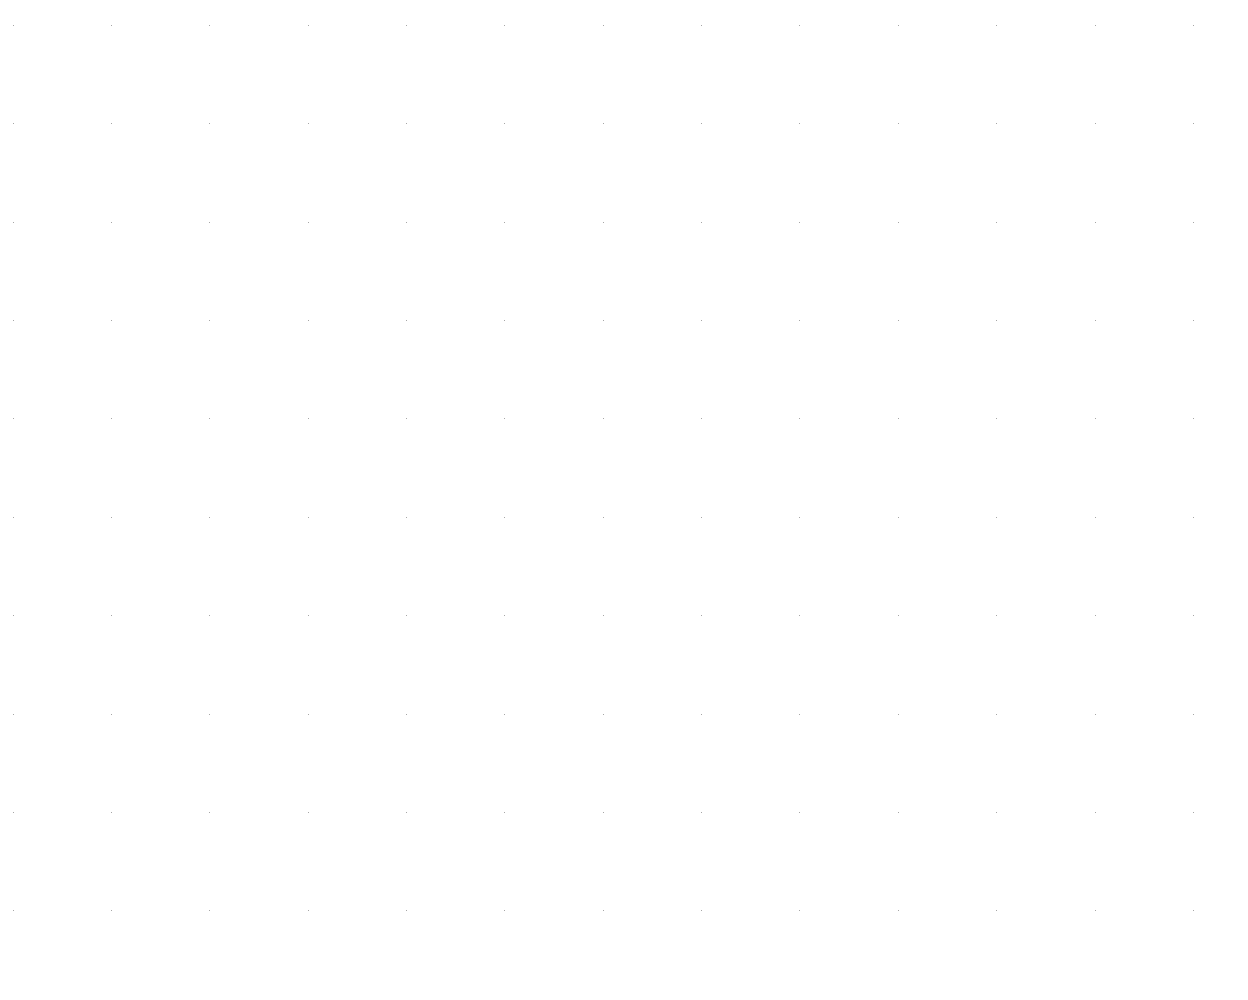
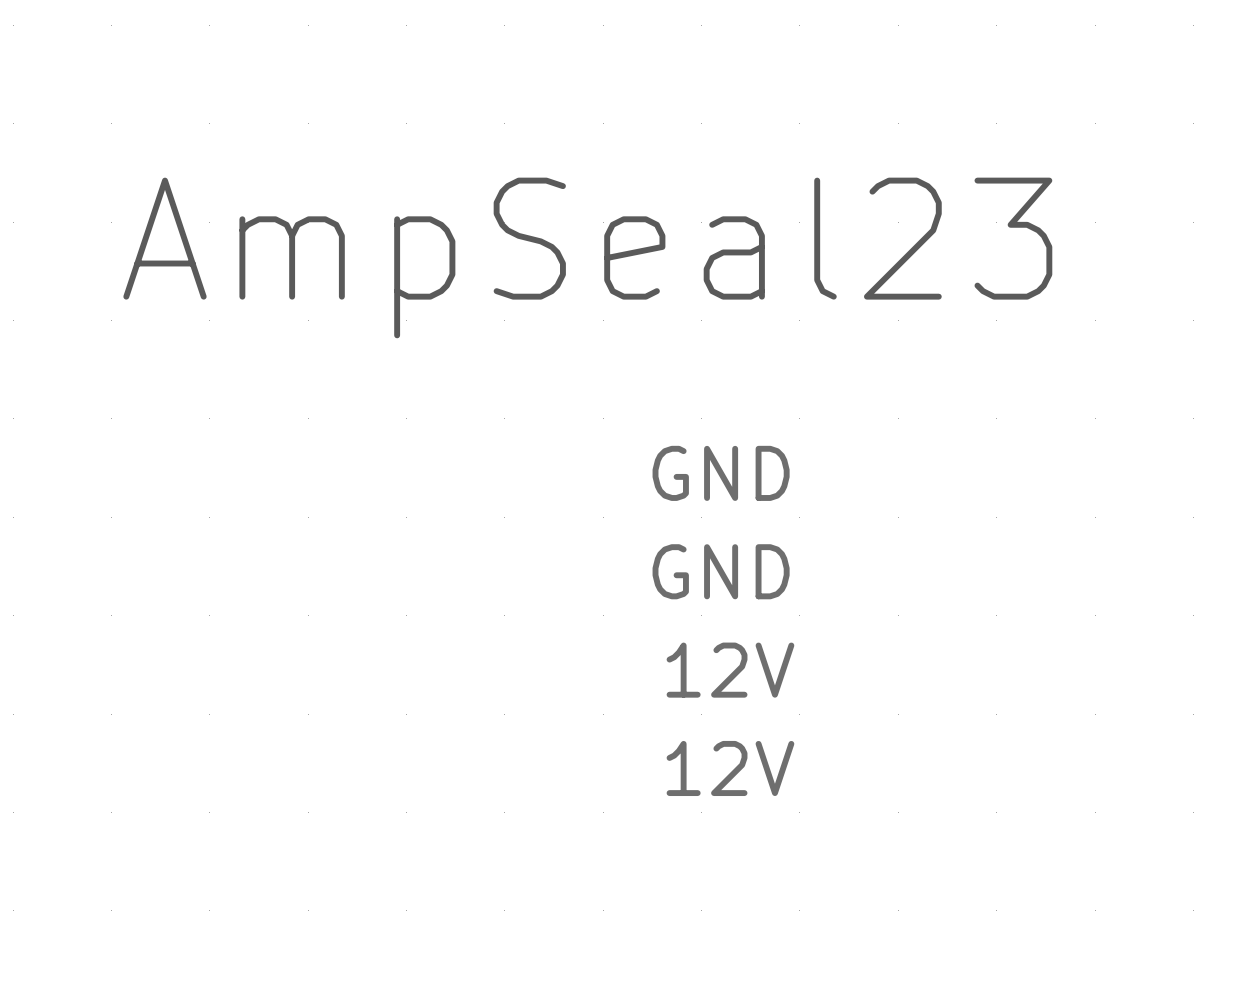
text: none -> AmpSeal23 (587, 257)
label: none -> GND (721, 473)
label: none -> GND (721, 571)
label: none -> 12V (730, 670)
label: none -> 12V (730, 768)

